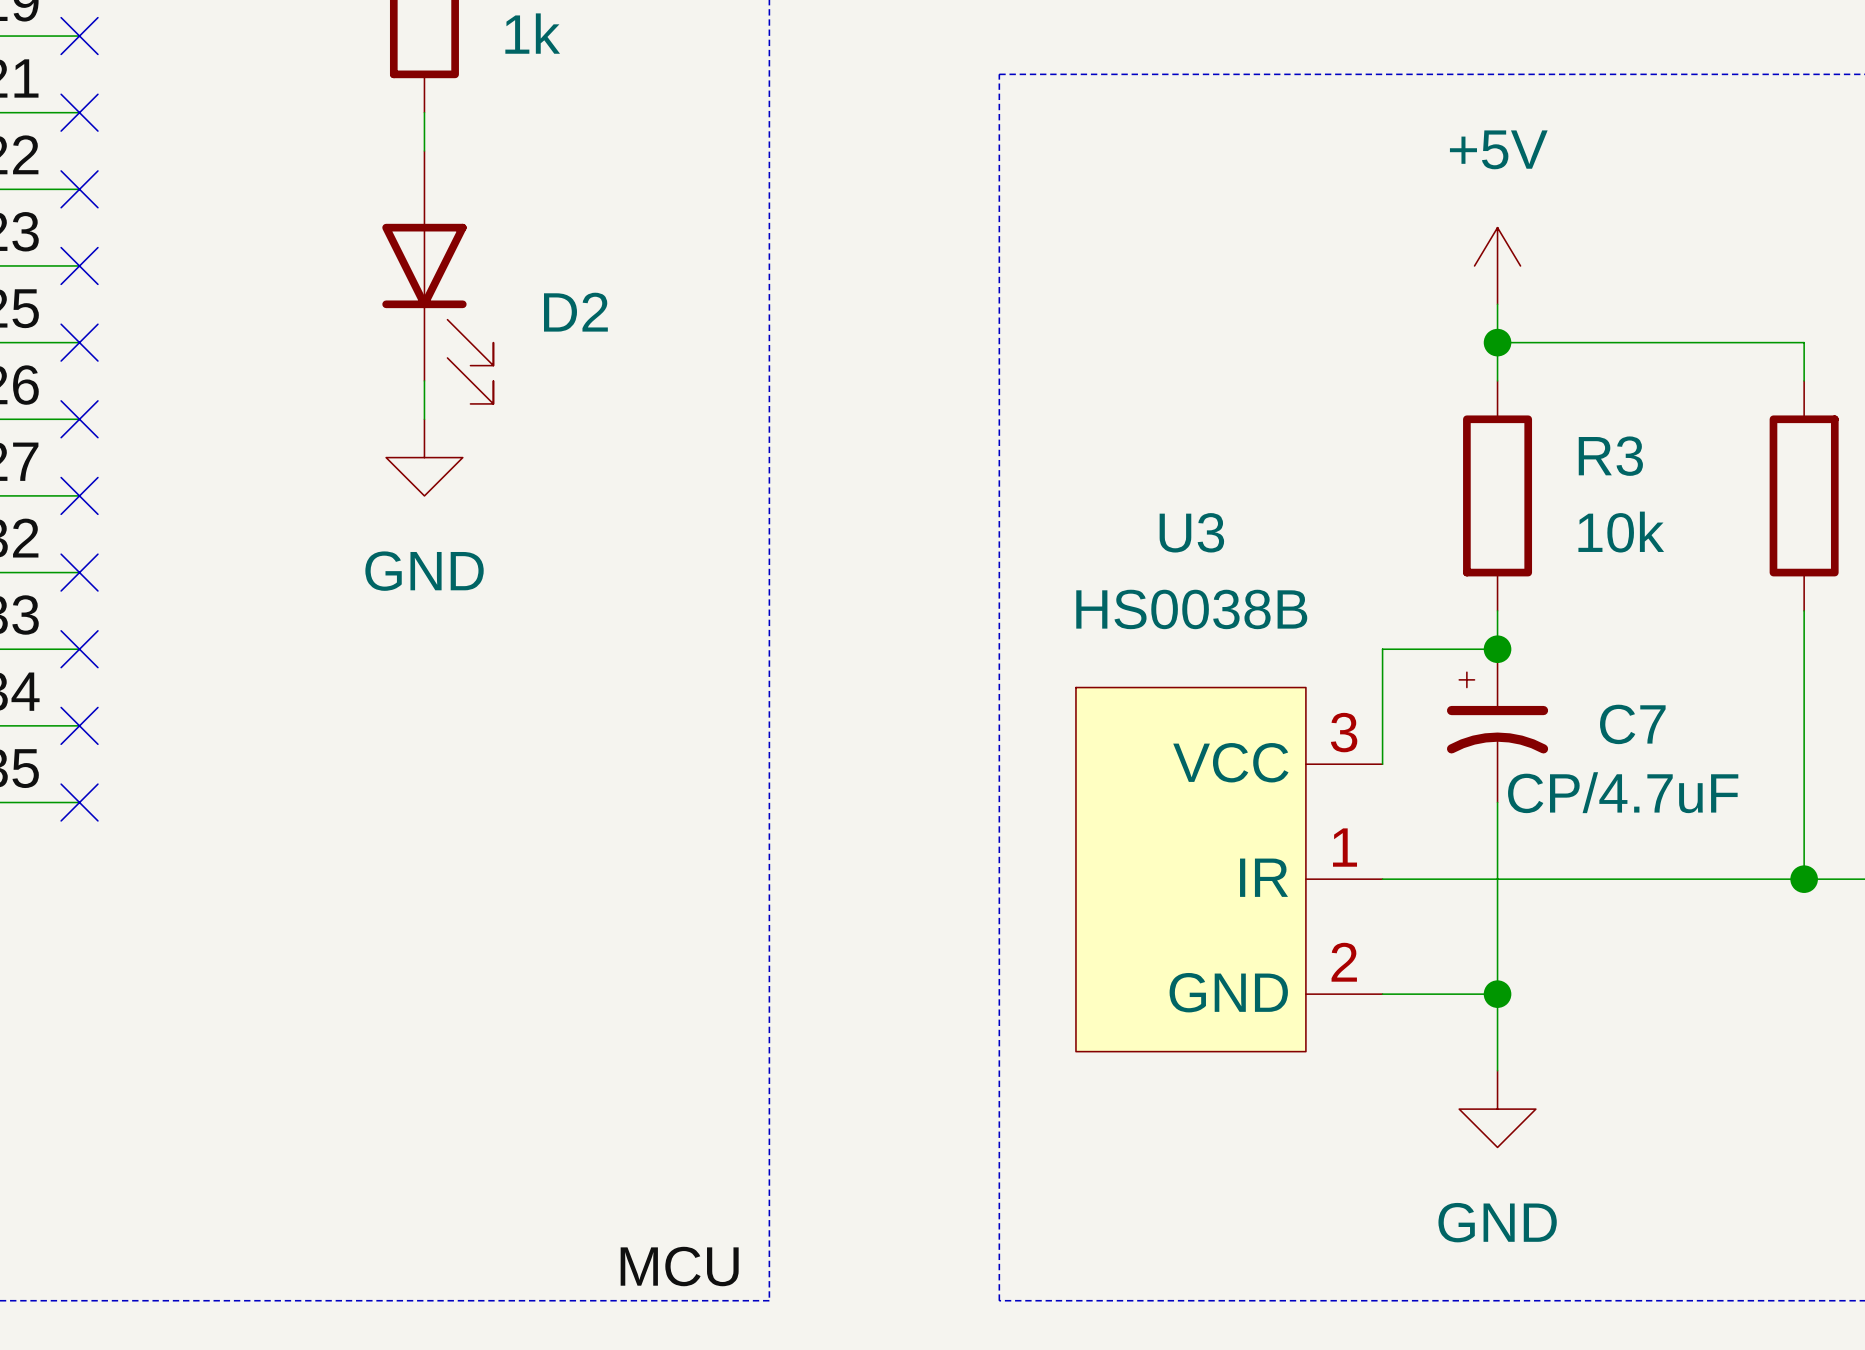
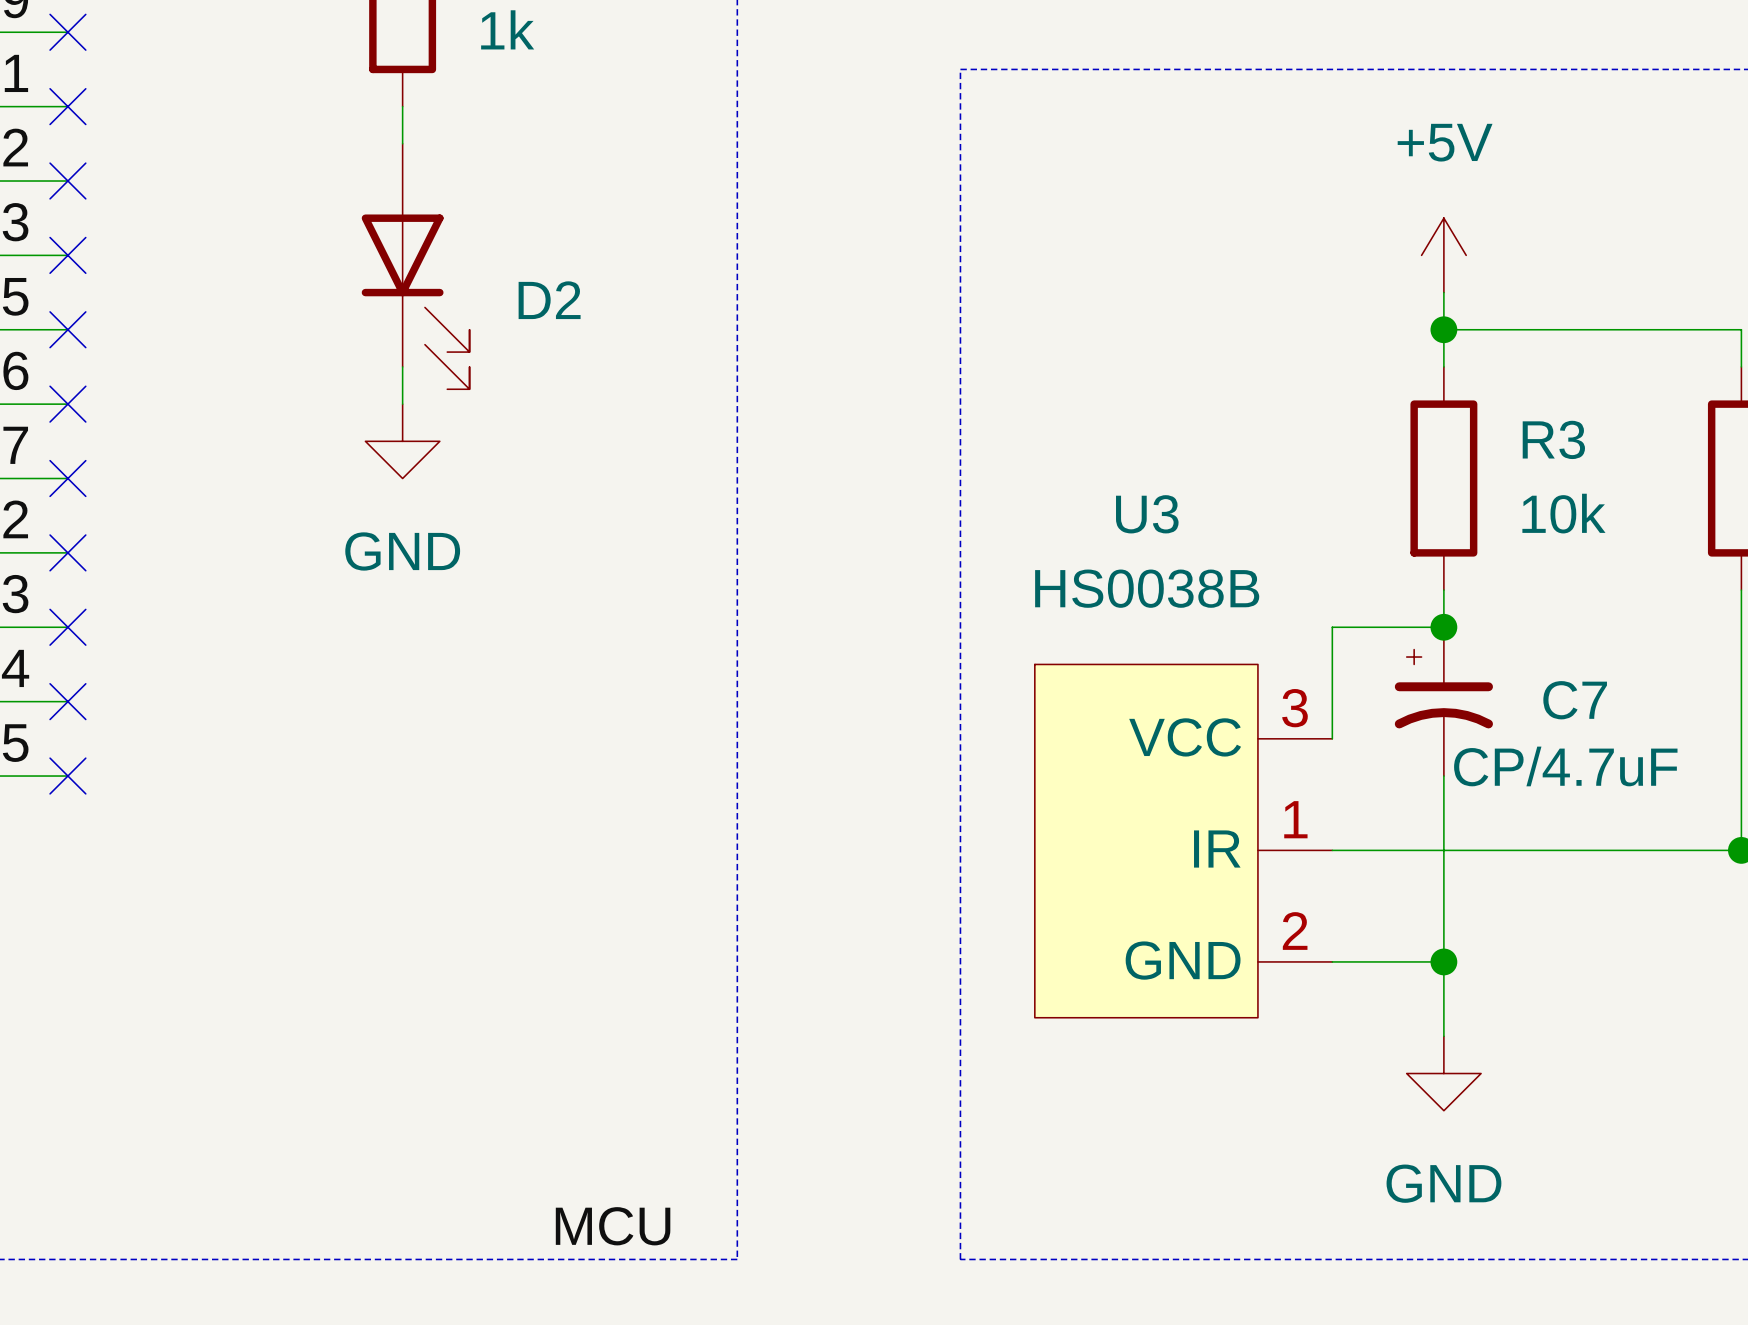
label position: MCU (679, 1266) -> MCU (613, 1226)

